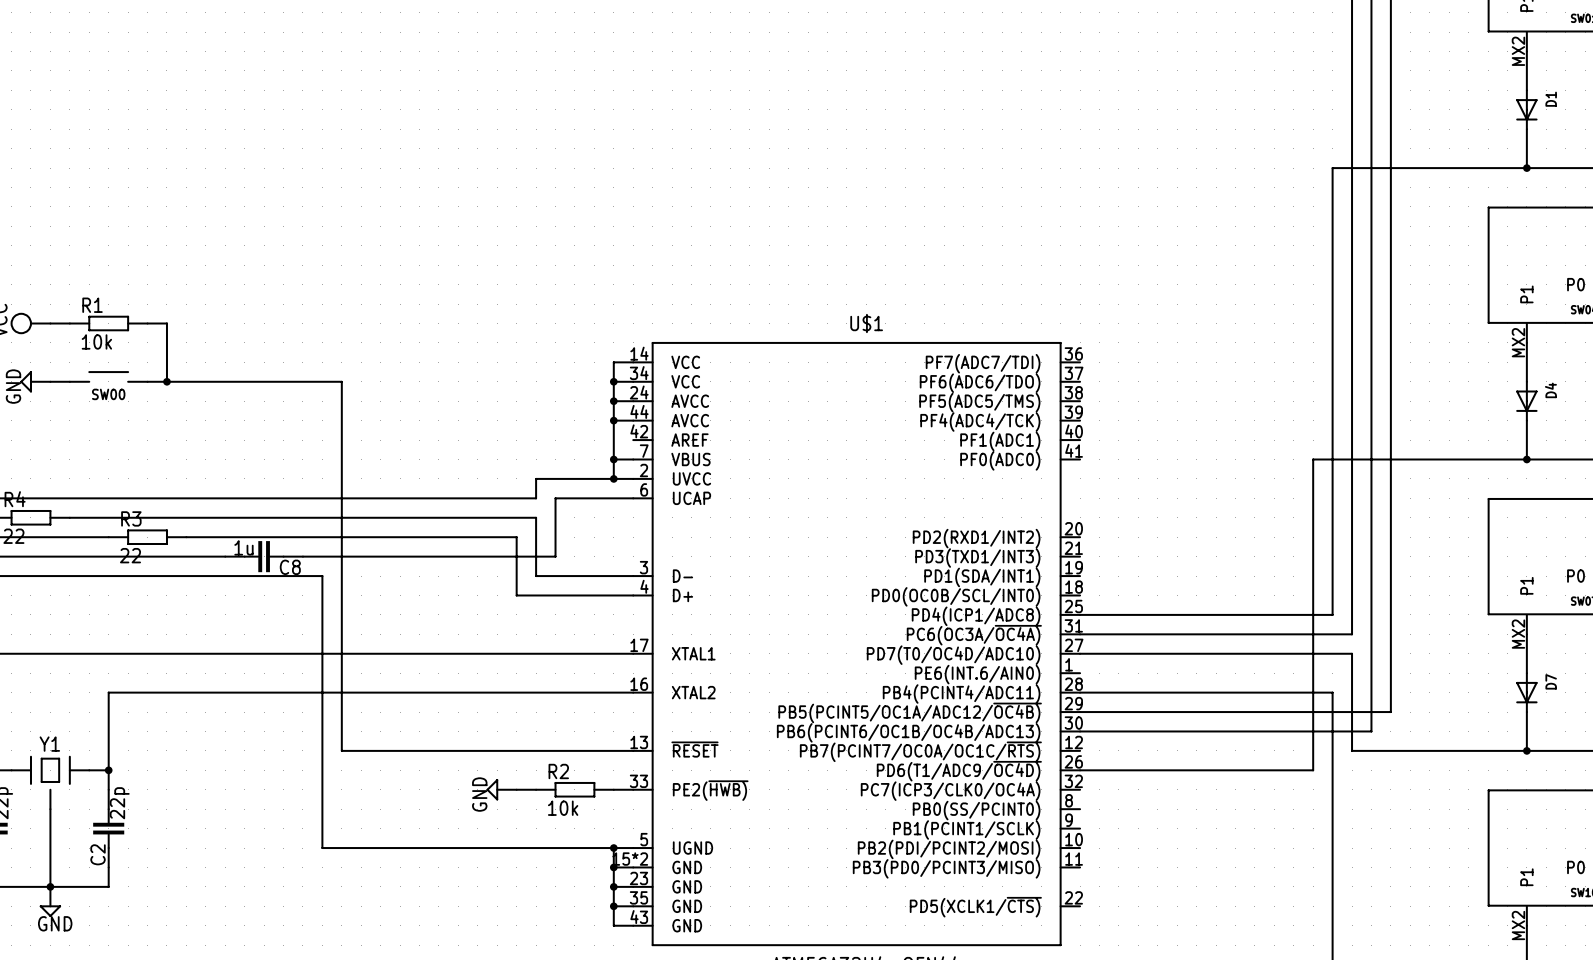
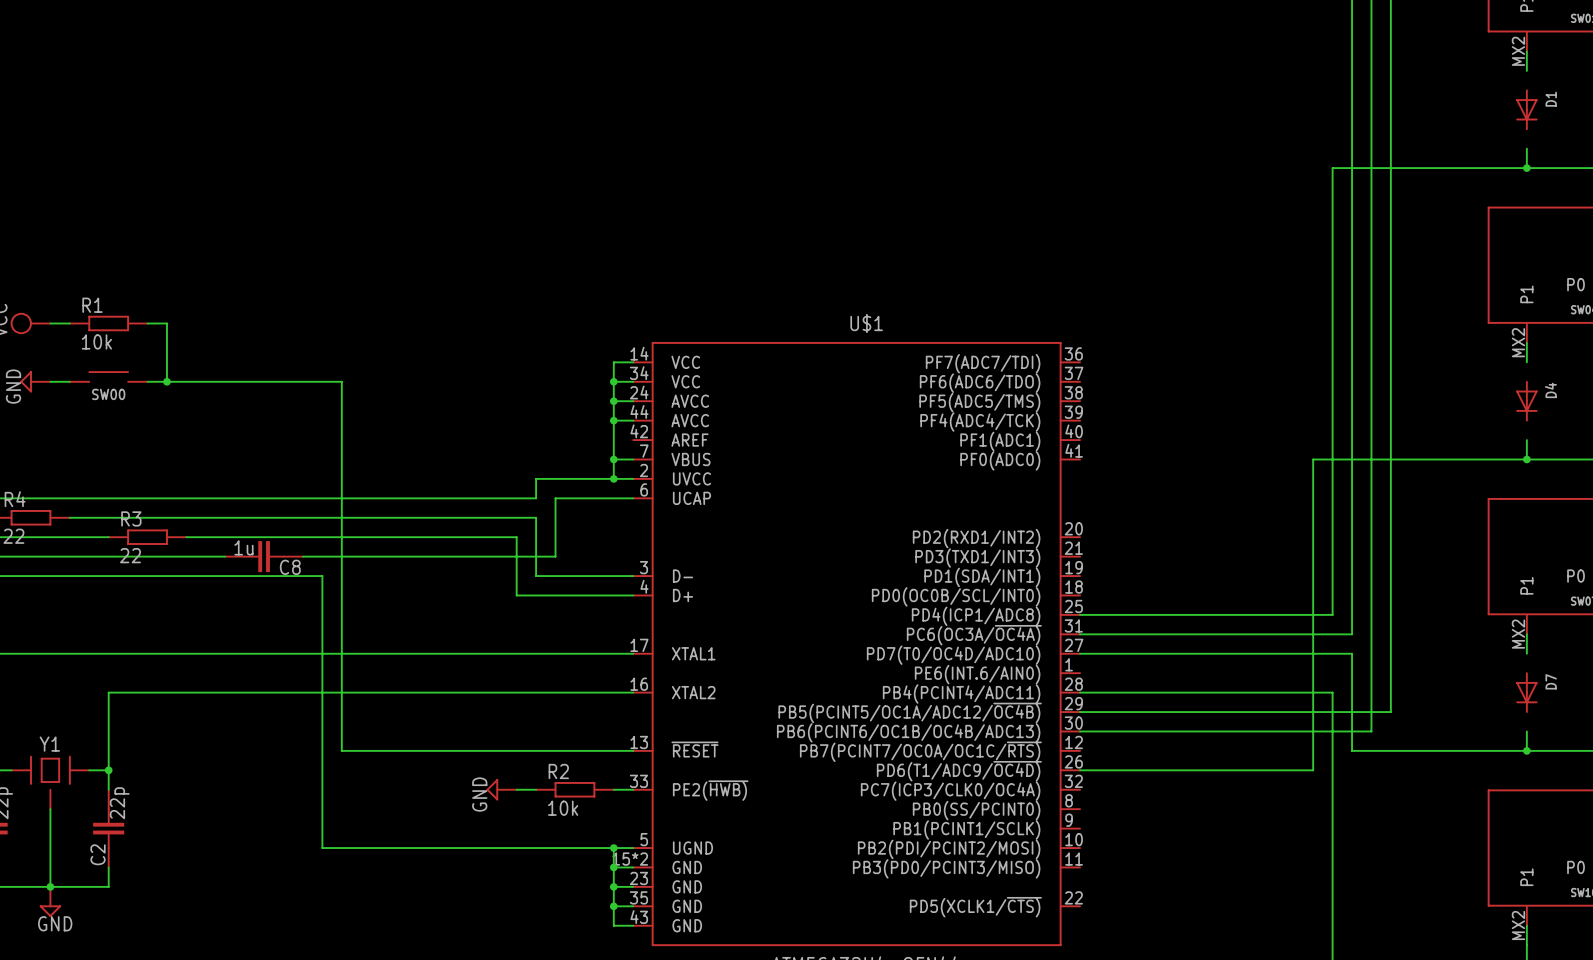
wire: (1526, 70) (1526, 90) -> none
wire: (1526, 129) (1526, 148) -> none
wire: (1526, 362) (1526, 381) -> none
wire: (1526, 420) (1526, 440) -> none
wire: (1526, 653) (1526, 673) -> none
wire: (1526, 712) (1526, 731) -> none

